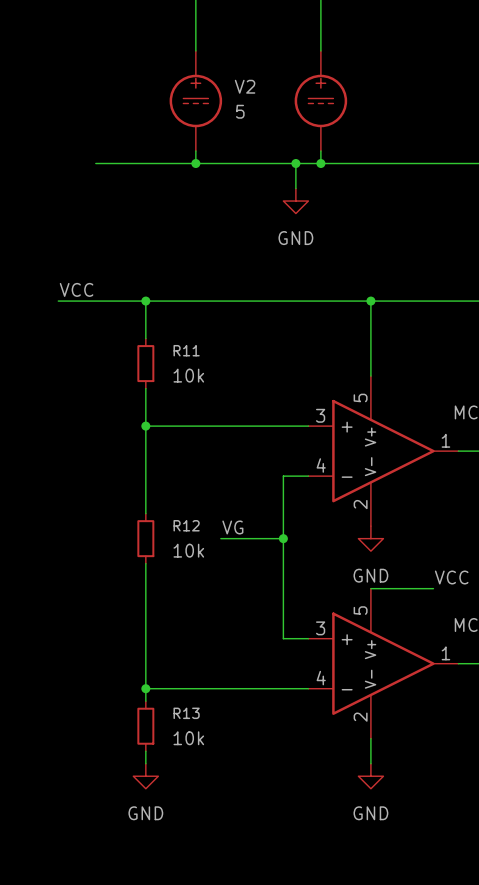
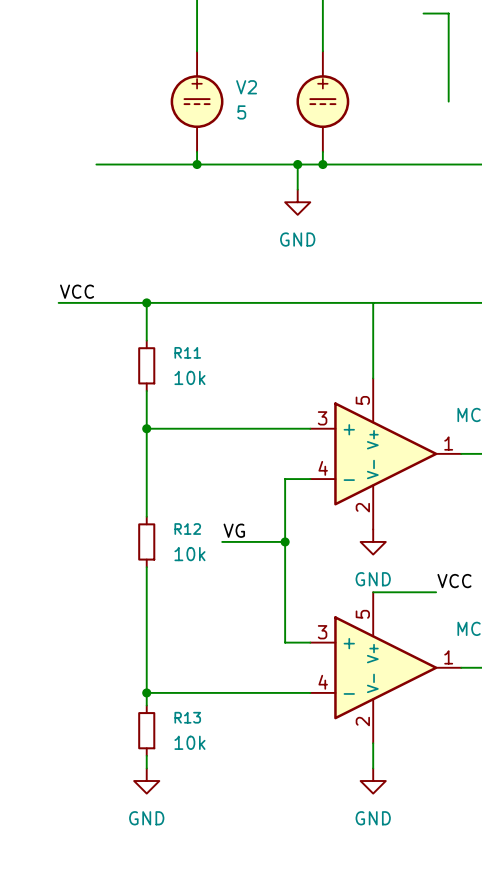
wire: none -> (423, 13) (448, 13) (448, 101)
junction: (370, 301) -> none

